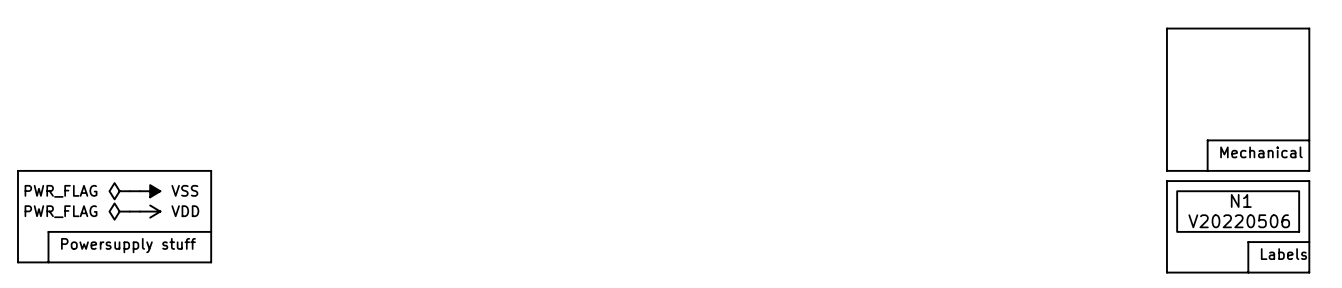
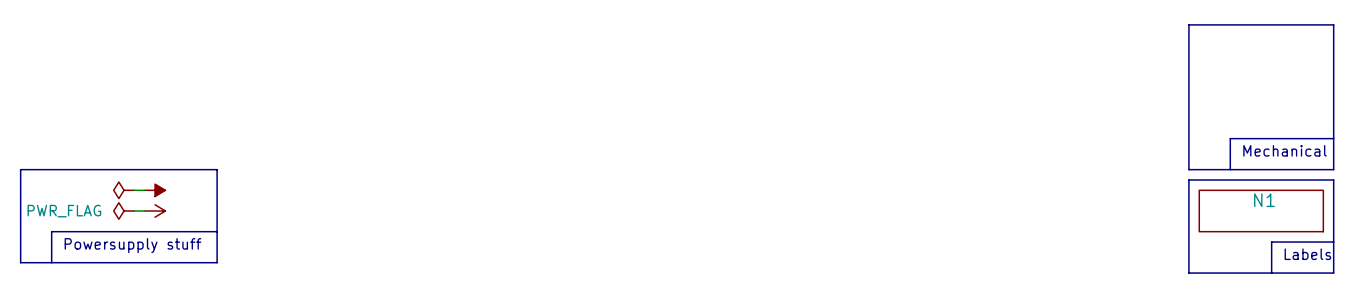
power symbol text: VSS (184, 190) -> none
power symbol text: PWR_FLAG (61, 191) -> none
power symbol text: VDD (185, 211) -> none
N1 value: V20220506 (1239, 221) -> none

